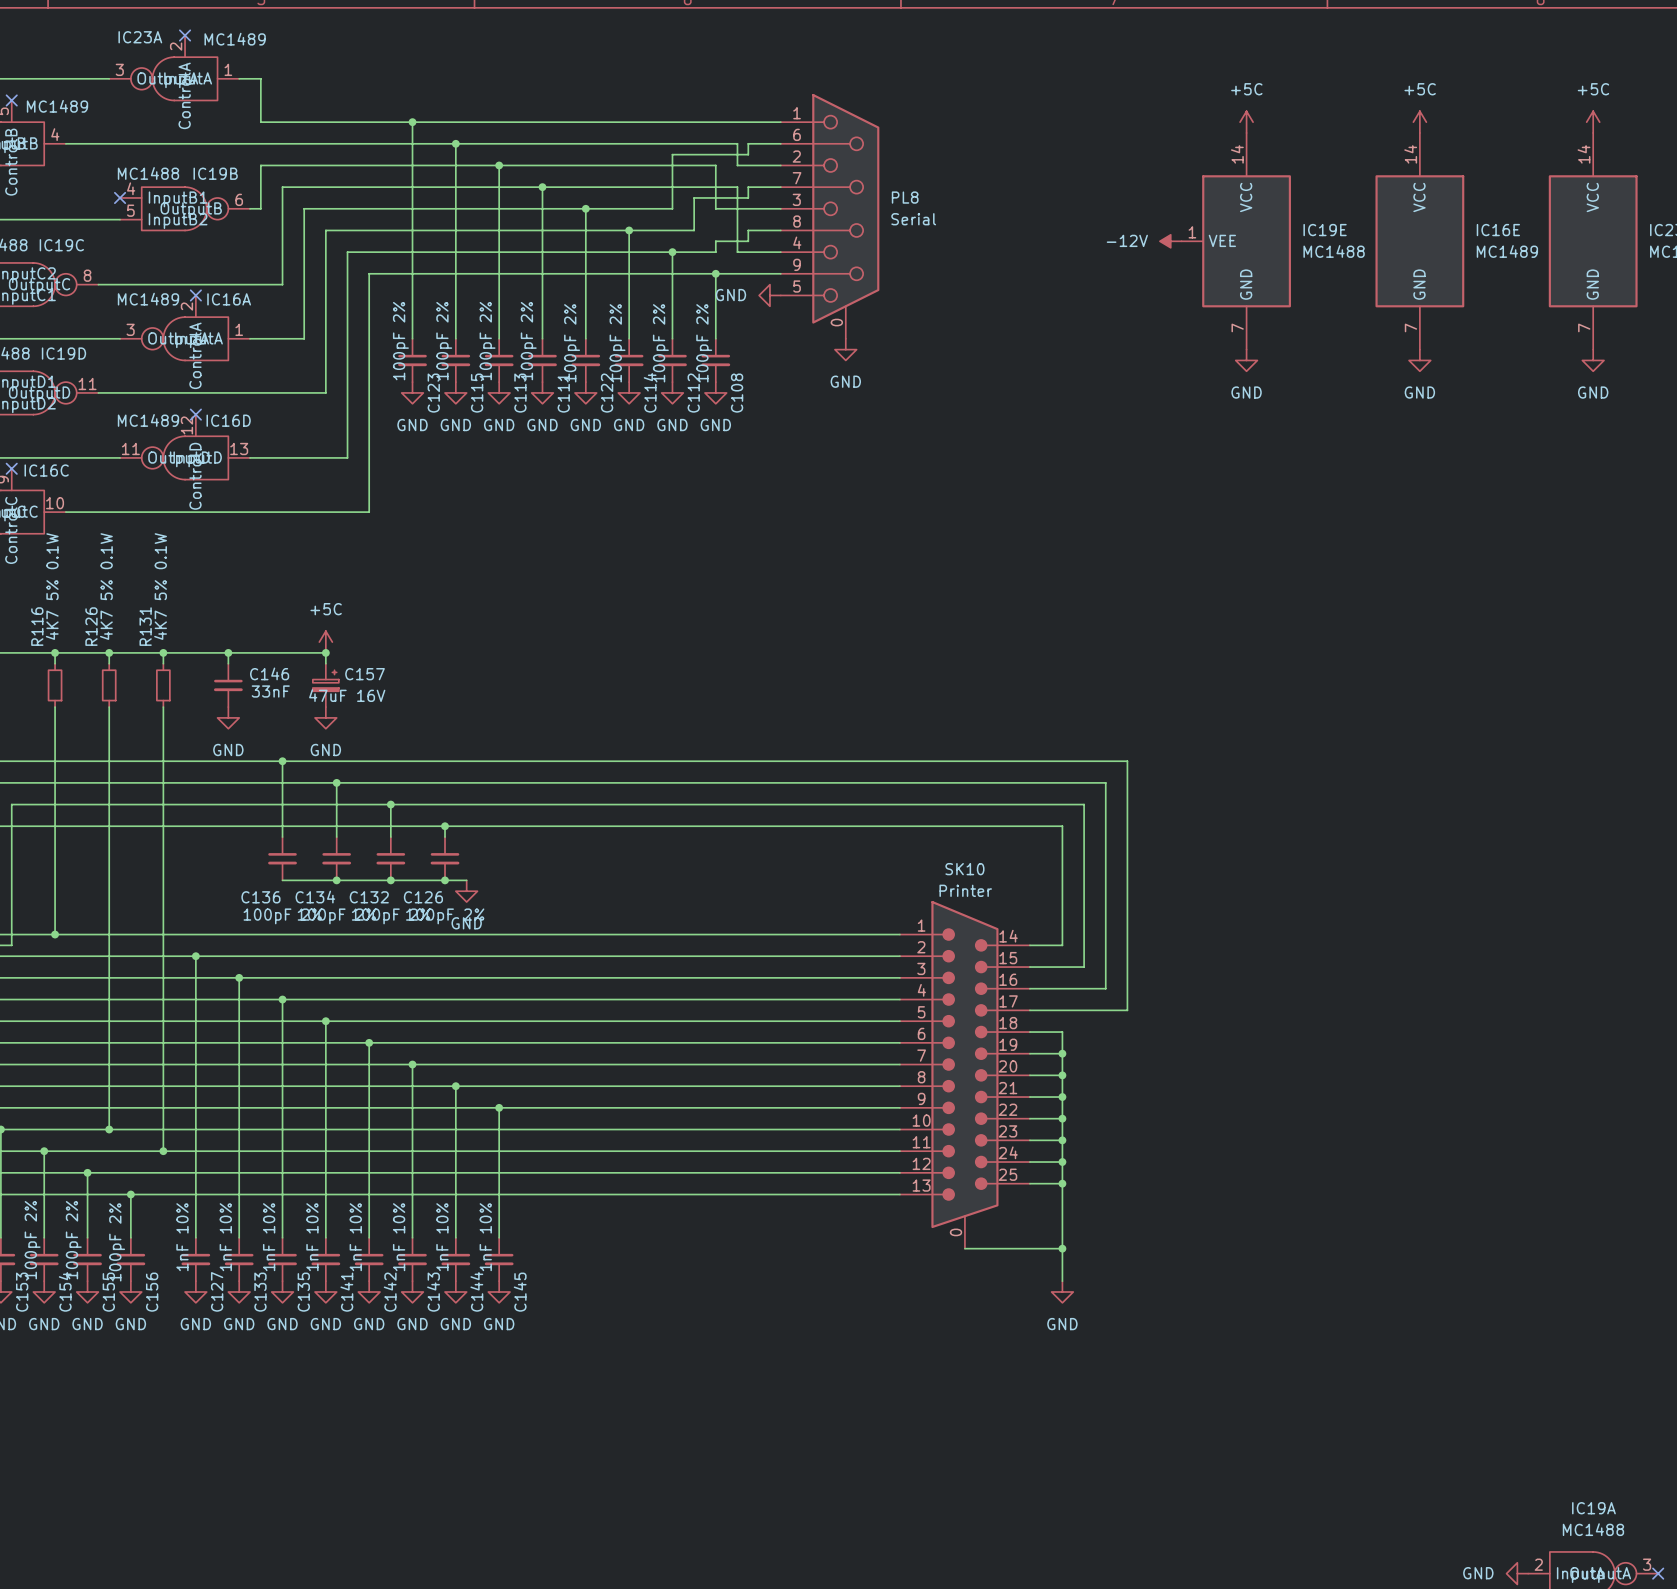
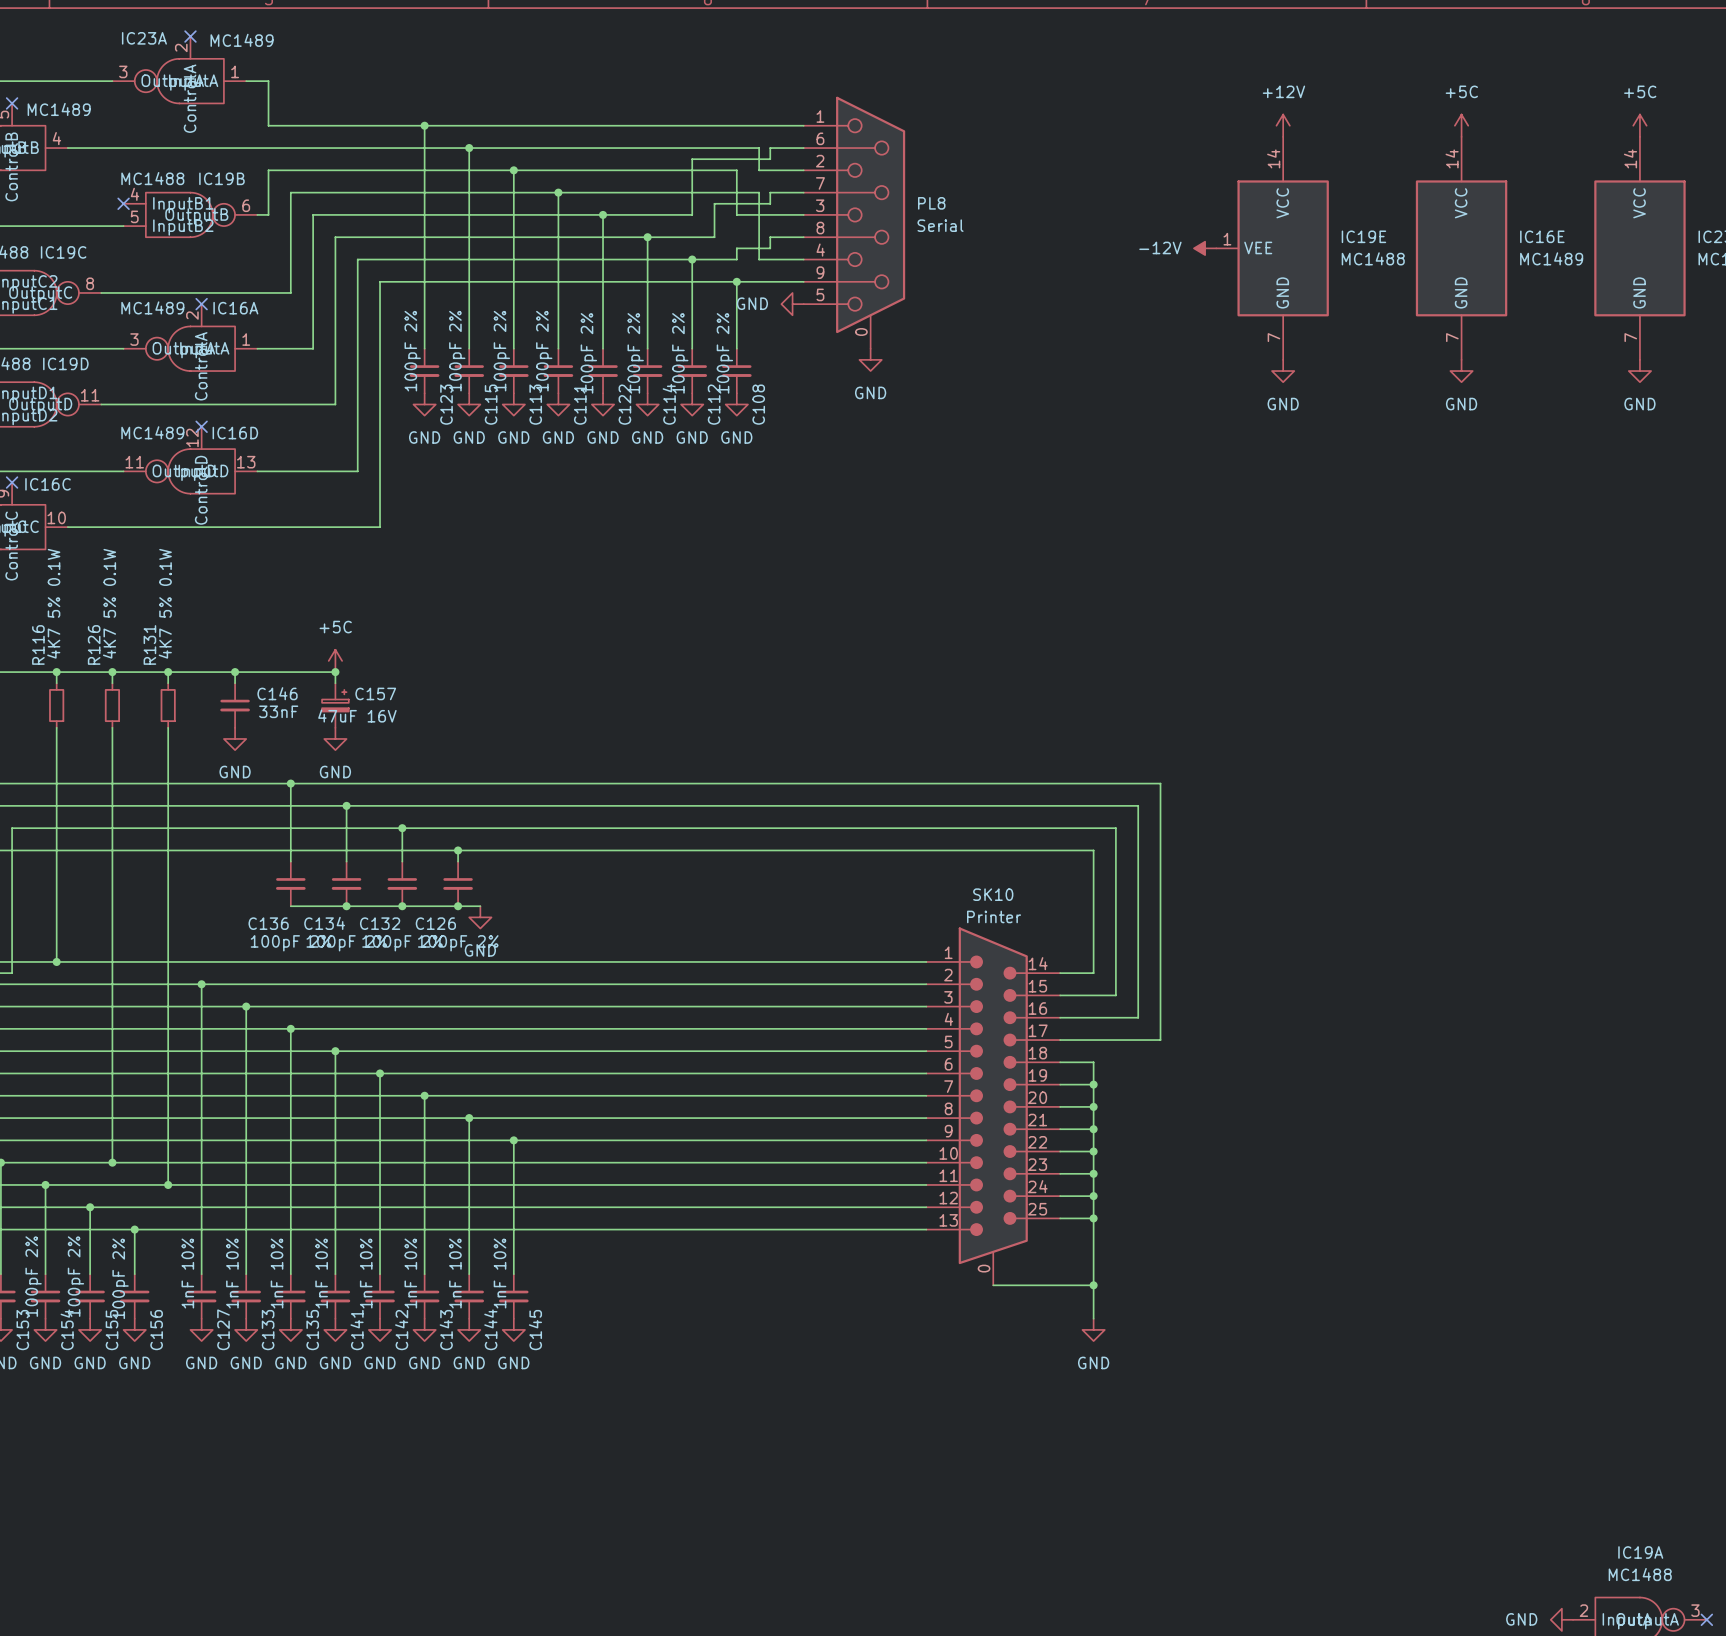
power symbol: +5C (1246, 122) -> +12V (1283, 125)

